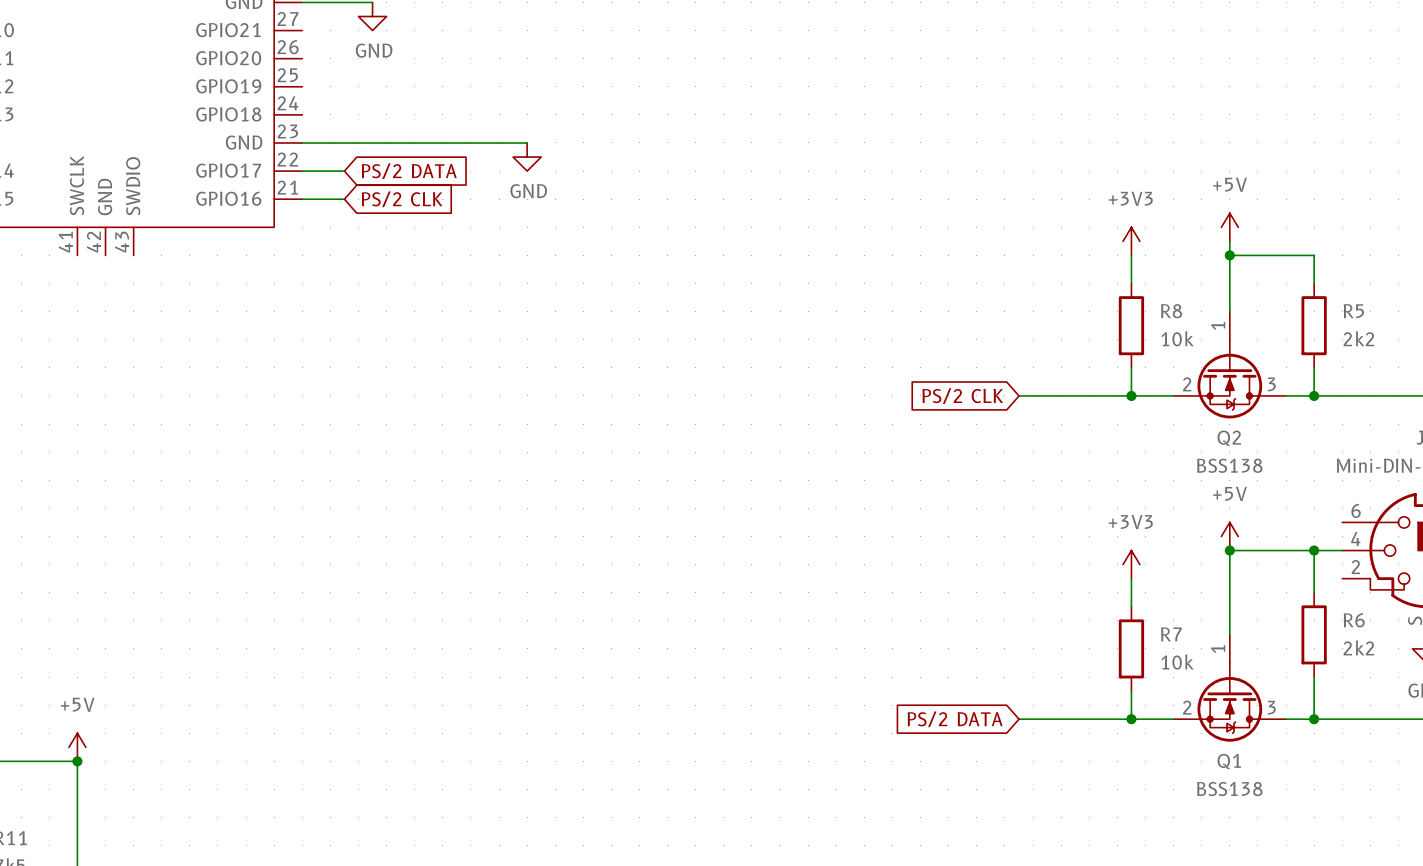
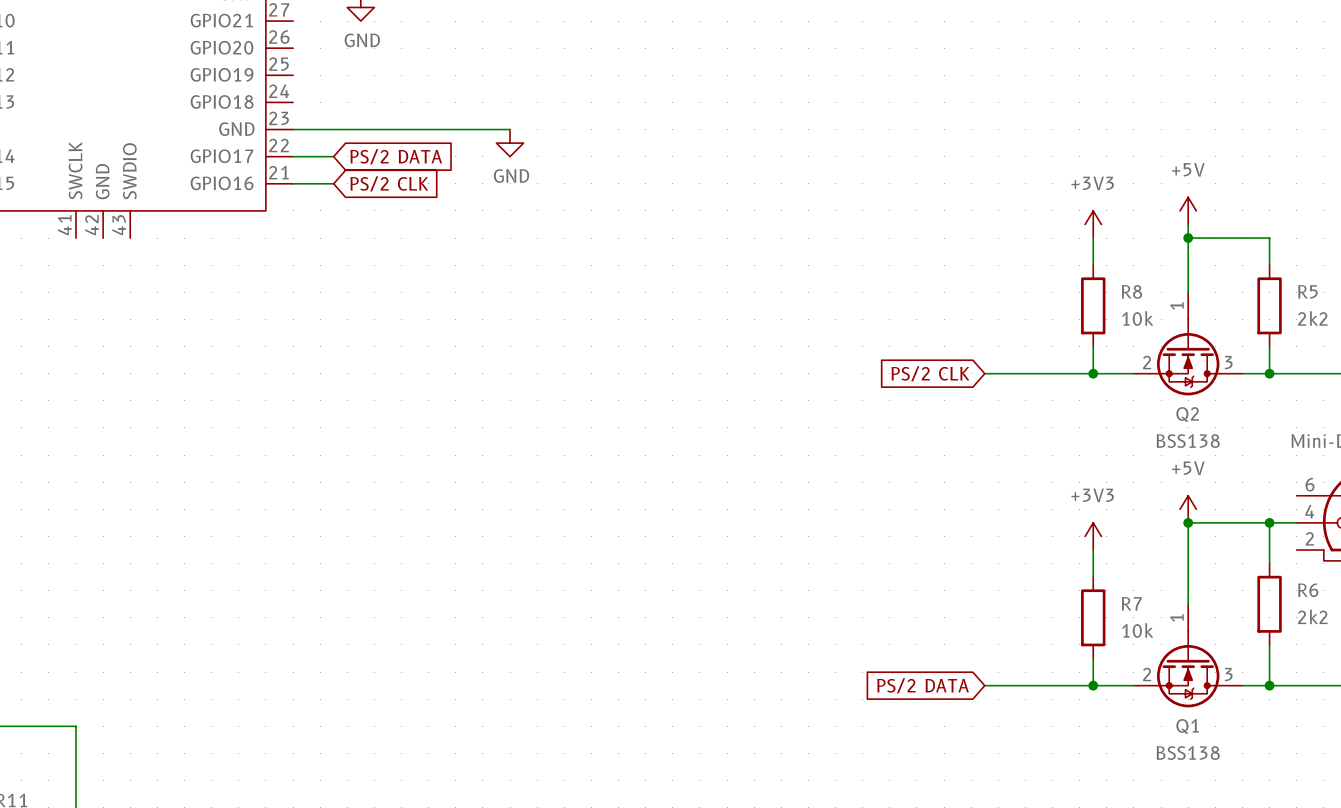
power symbol: +5V (77, 747) -> none
junction: (77, 761) -> none

